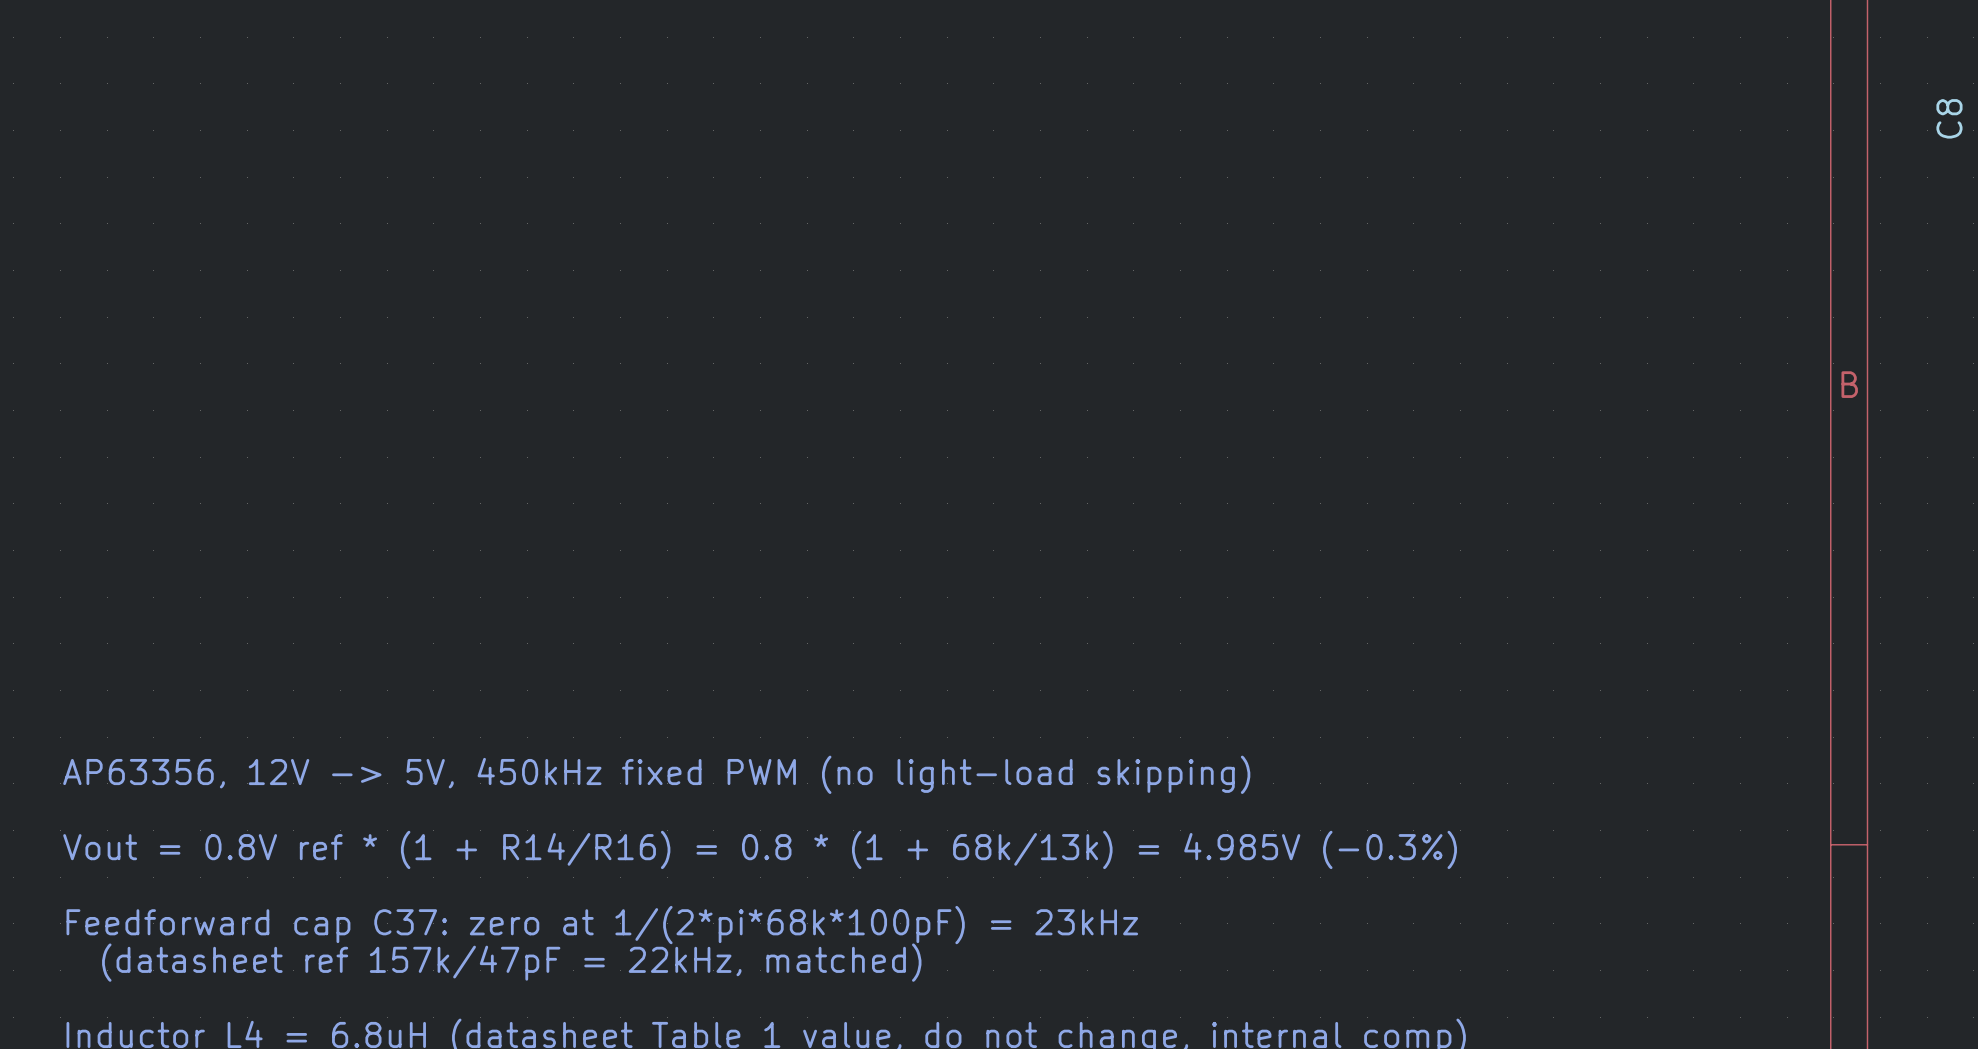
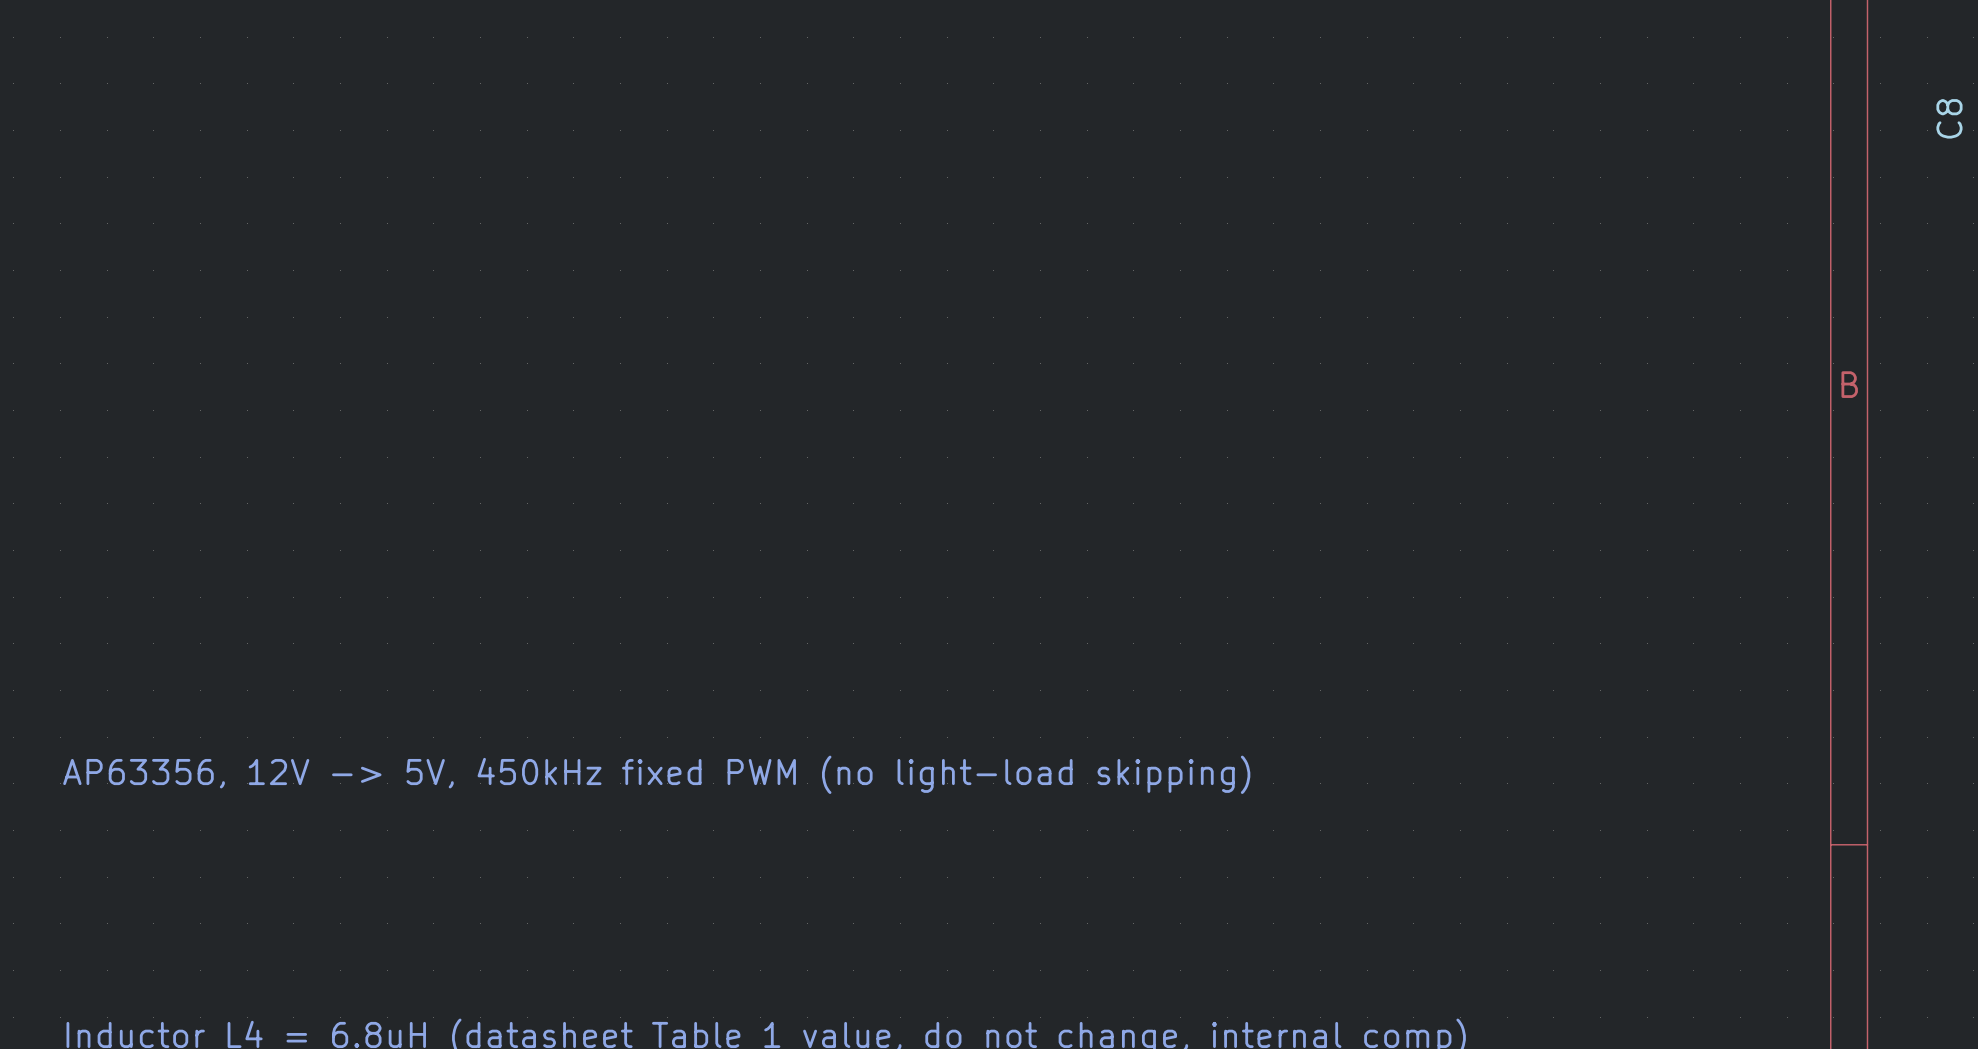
text: Vout = 0.8V ref * (1 + R14/R16) = 0.8 * (1 + 68k/13k) = 4.985V (-0.3%) (760, 849) -> none
text: Feedforward cap C37: zero at 1/(2*pi*68k*100pF) = 23kHz (602, 925) -> none
text: (datasheet ref 157k/47pF = 22kHz, matched) (511, 962) -> none

